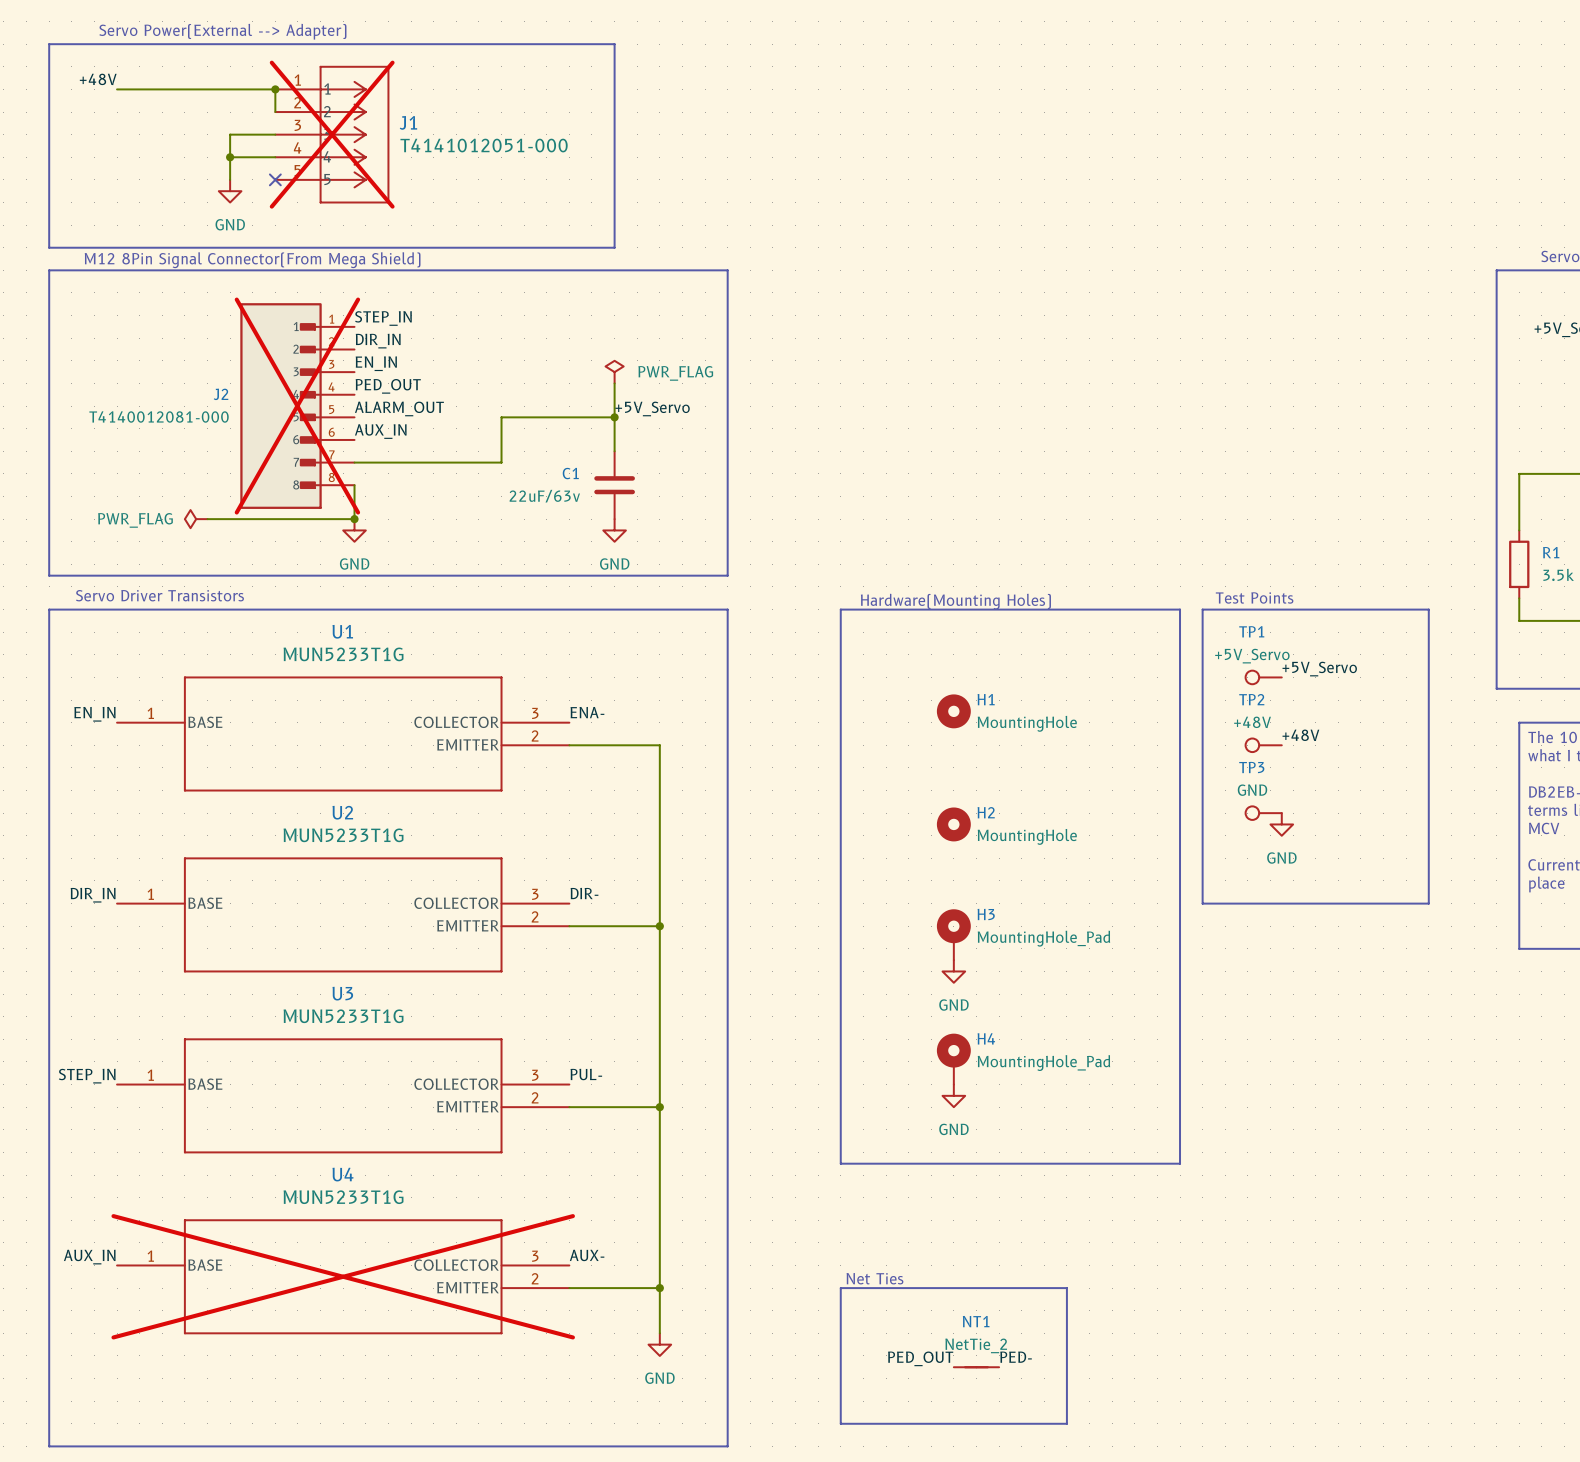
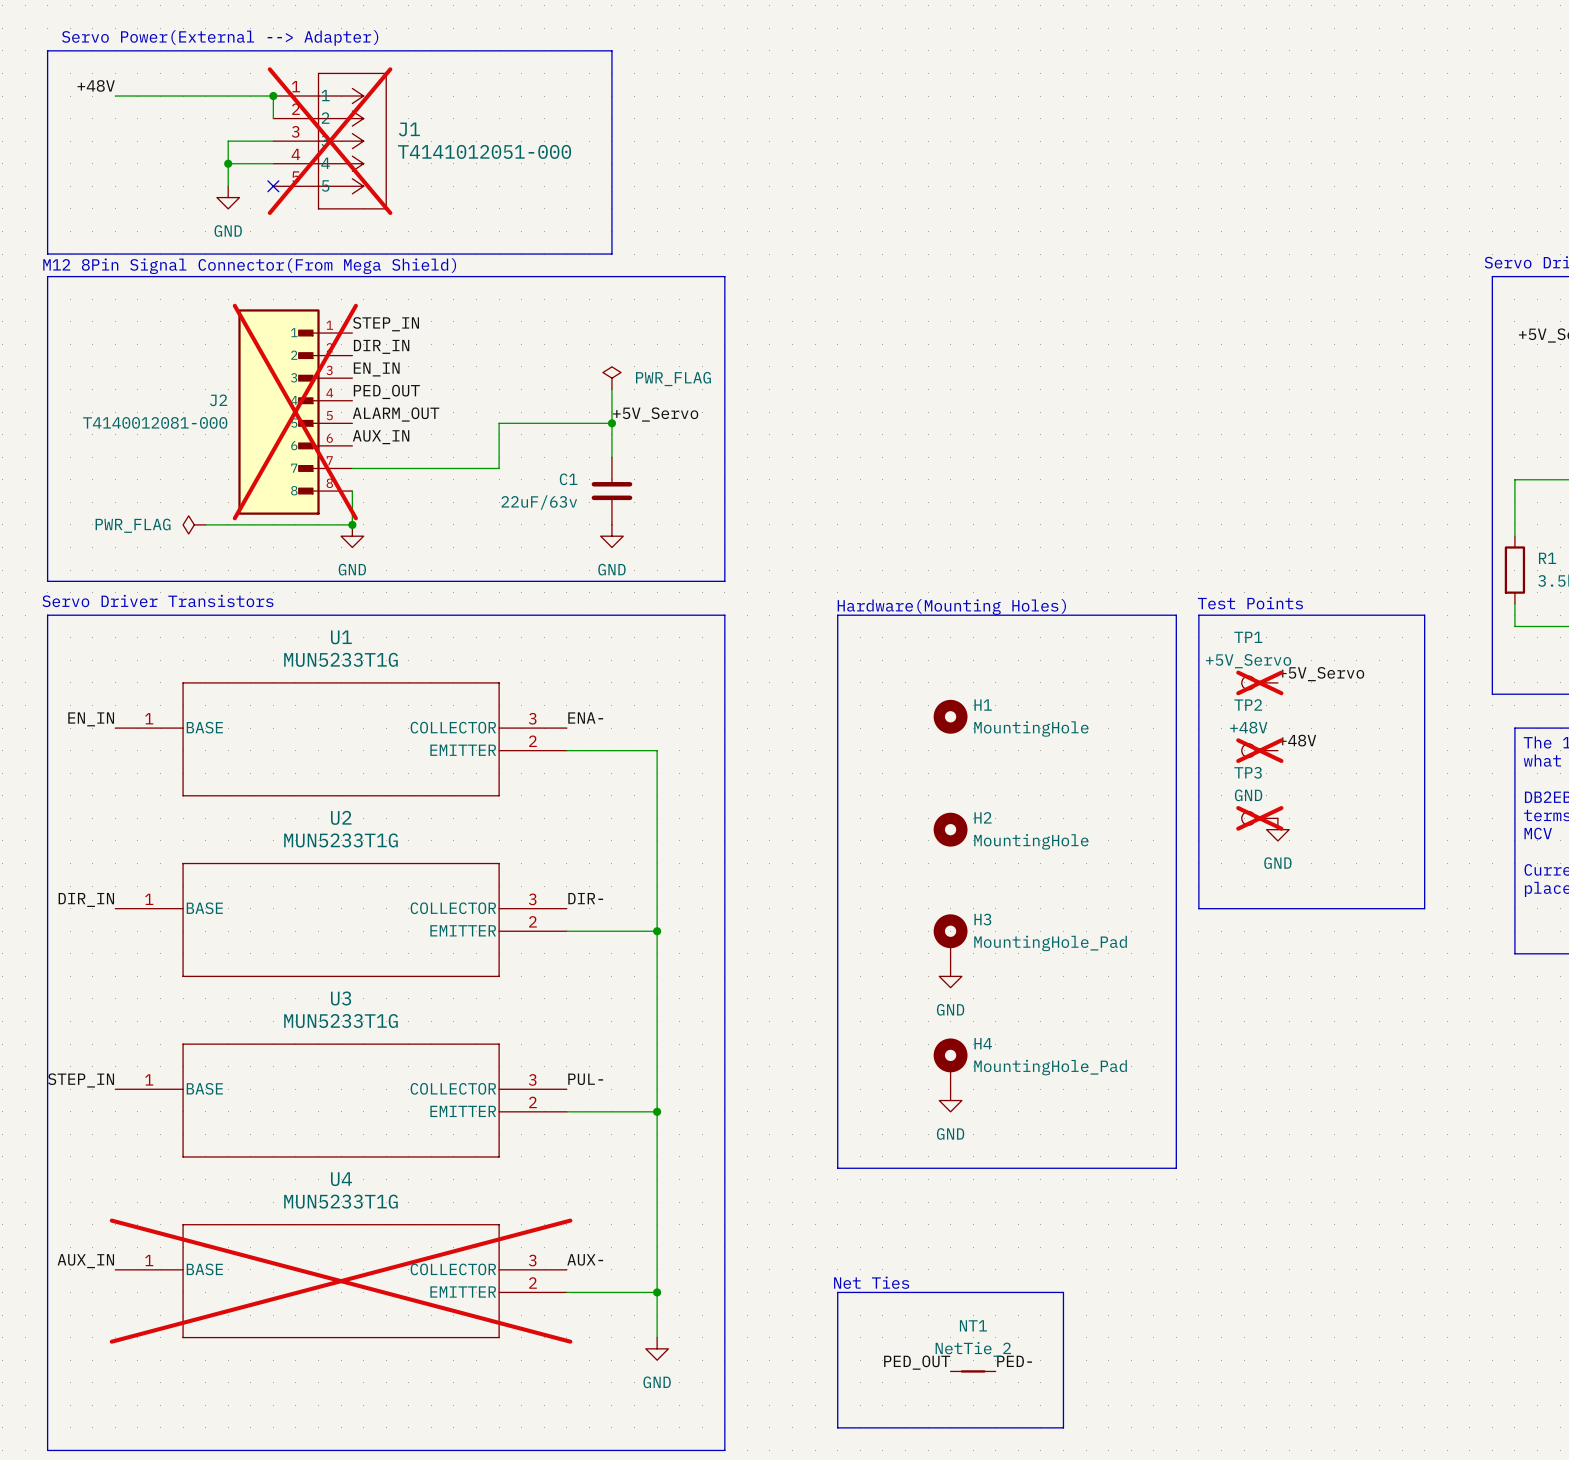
TP1 do-not-place cross: none -> (1259, 682)
TP2 do-not-place cross: none -> (1259, 750)
TP3 do-not-place cross: none -> (1259, 818)

